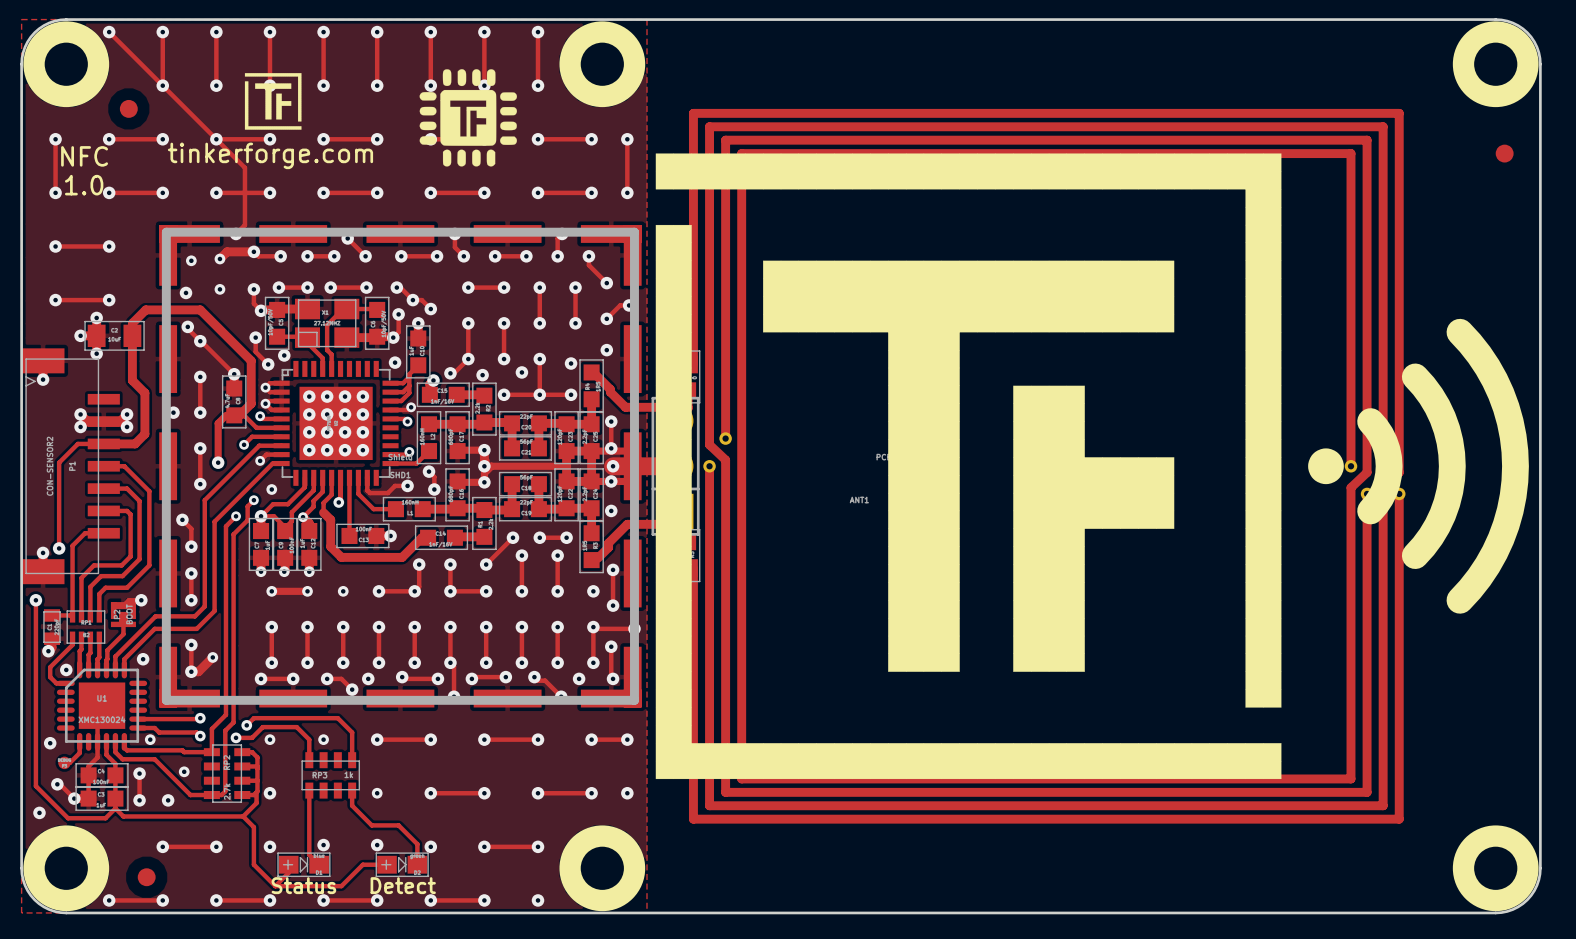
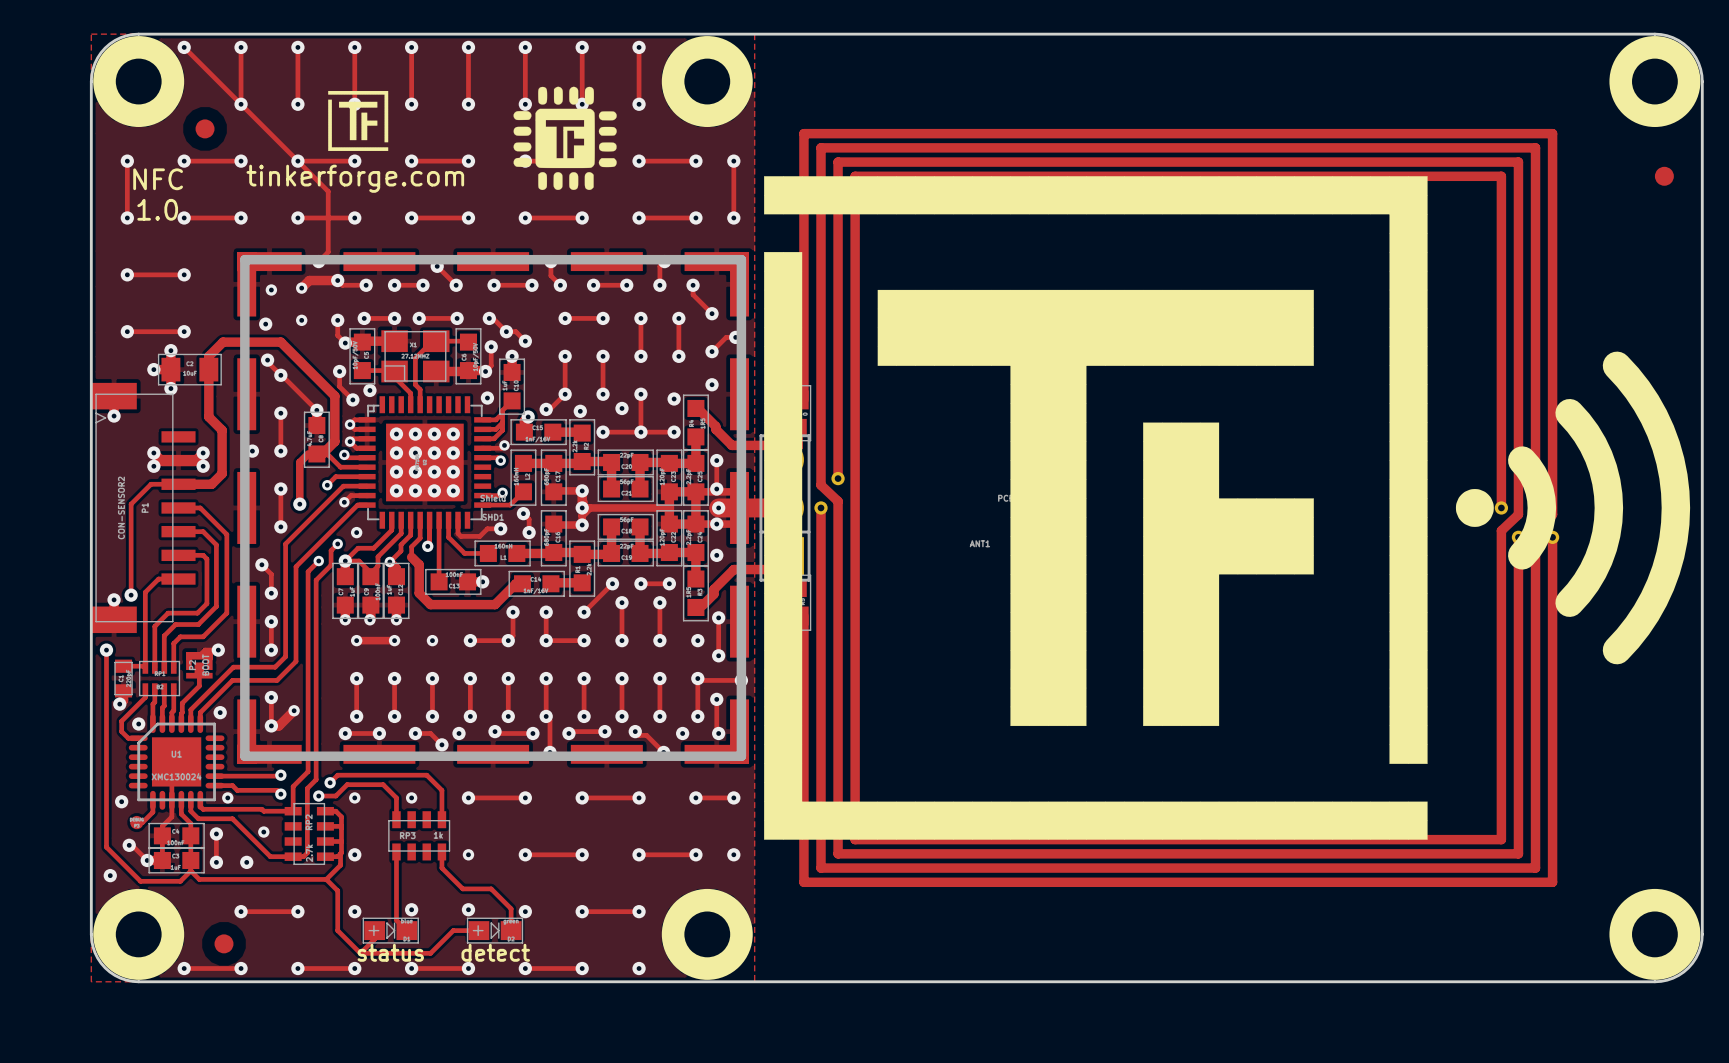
text: Status (303, 885) -> status (390, 952)
text: Detect (403, 885) -> detect (495, 952)

